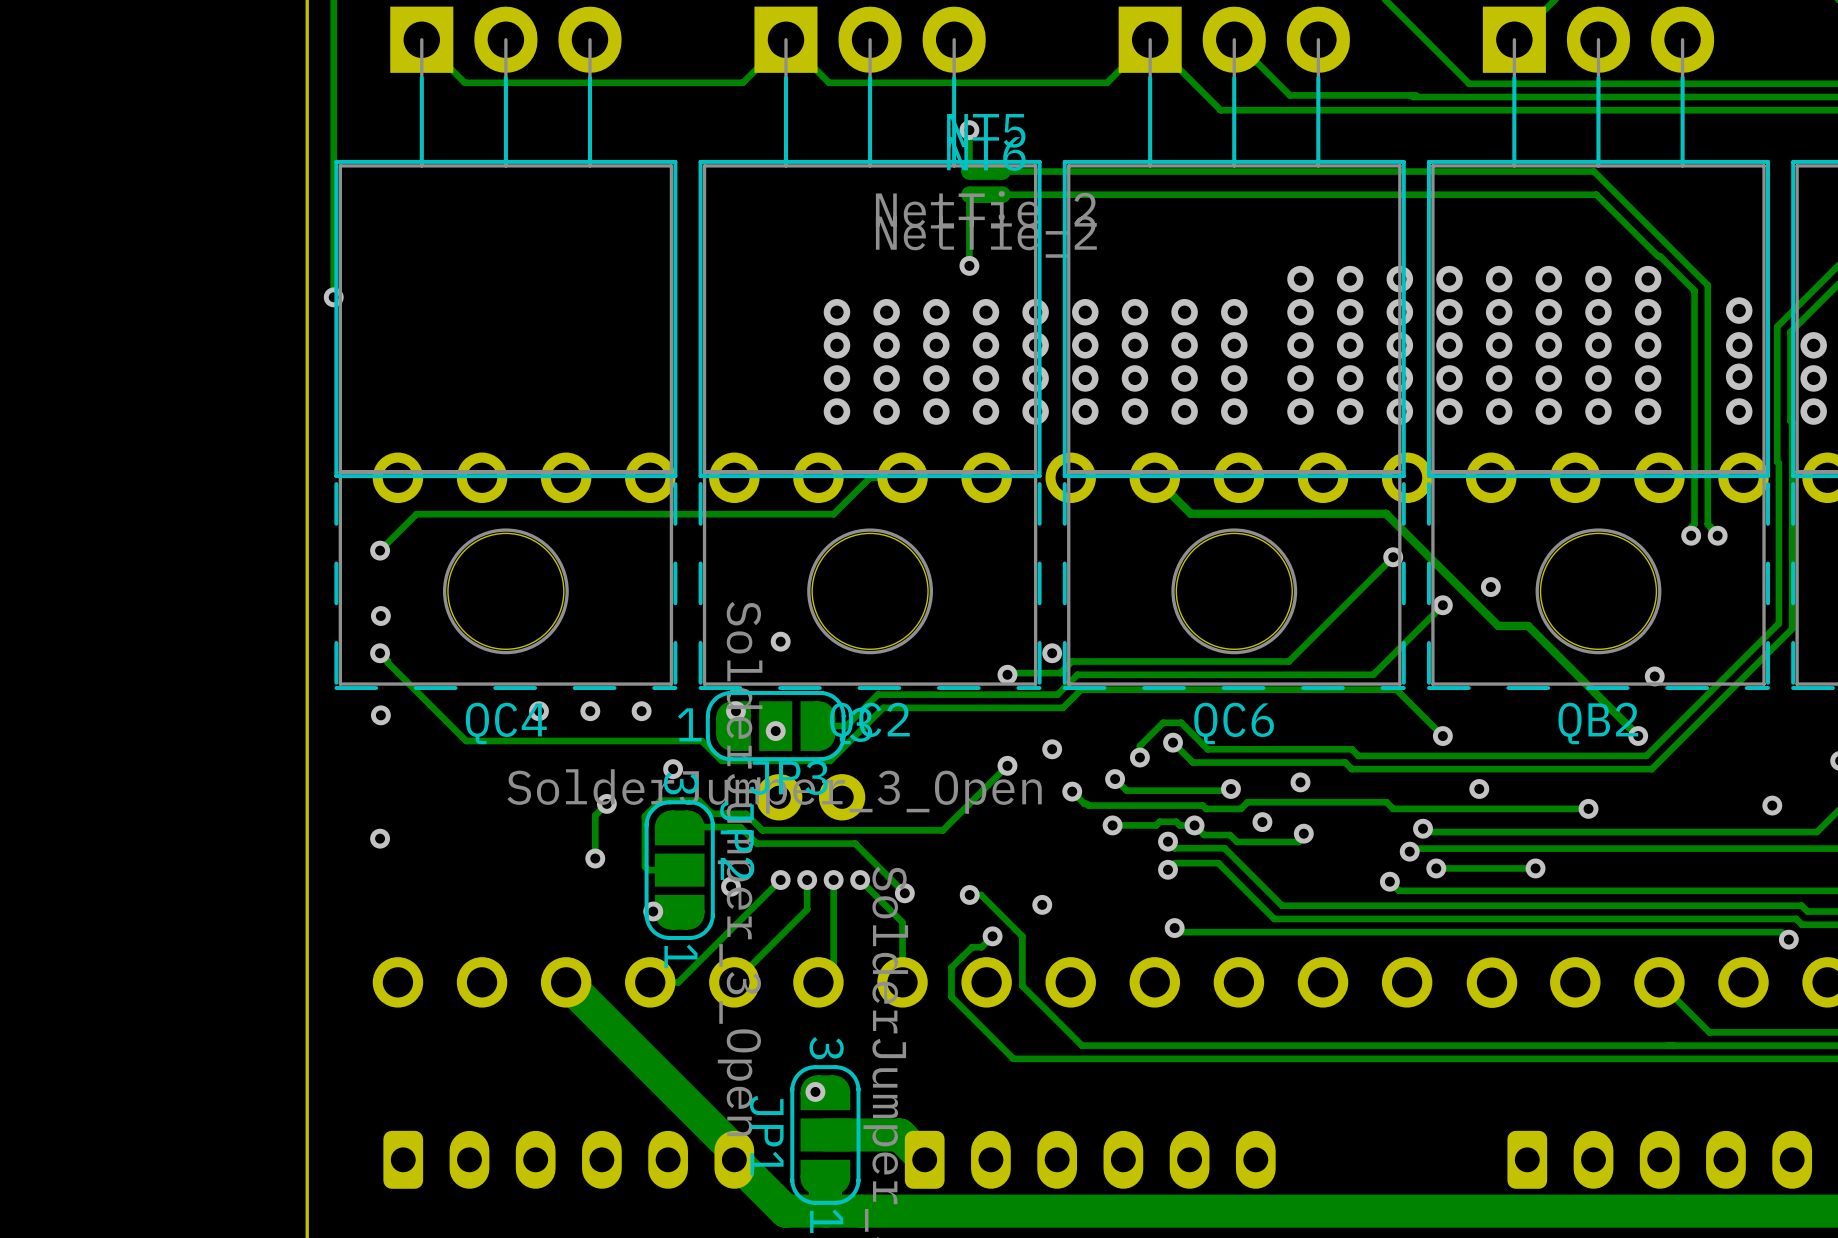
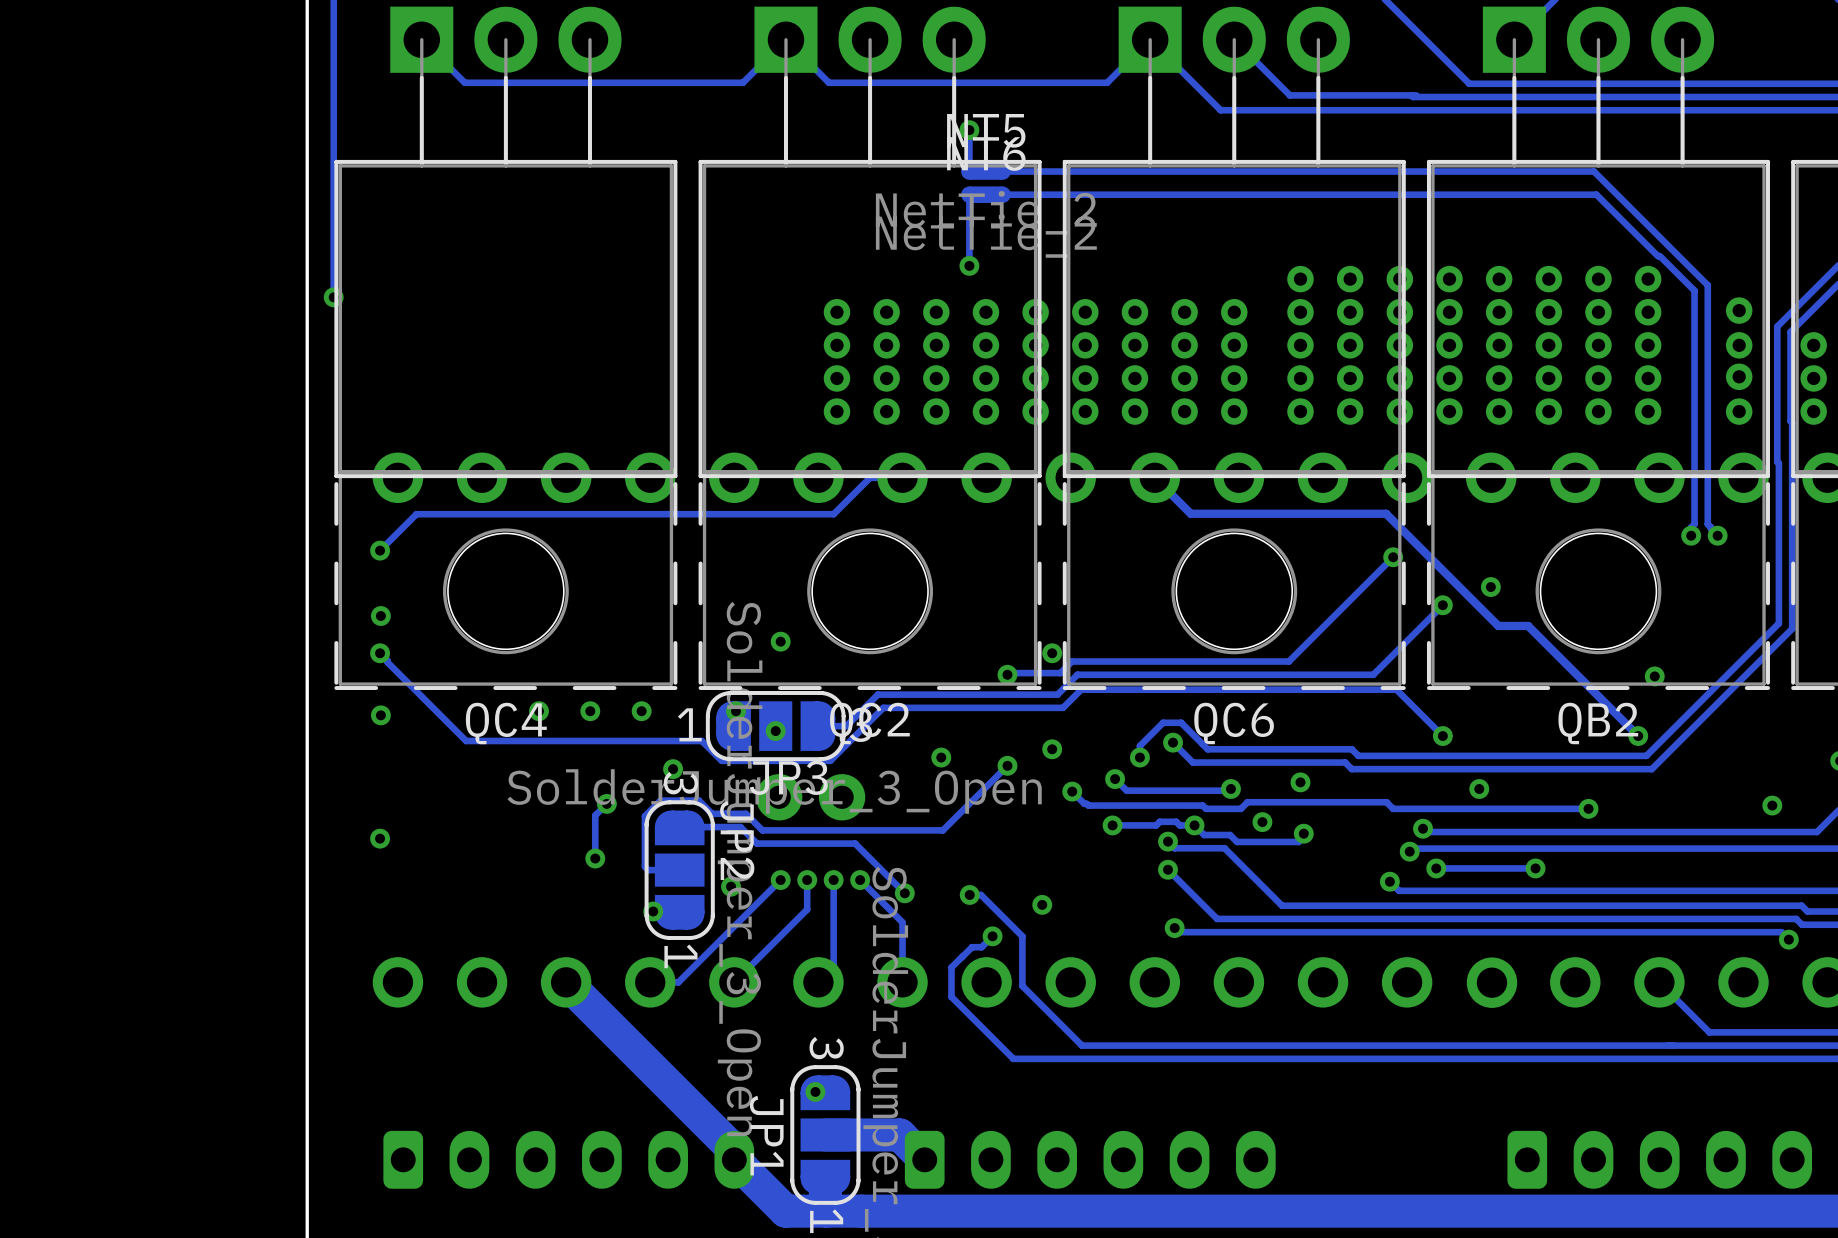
via: none -> (941, 757)
track: (1168, 869) (1174, 863) (1218, 863) (1274, 918) -> (1168, 869) (1217, 918) (1274, 918)

